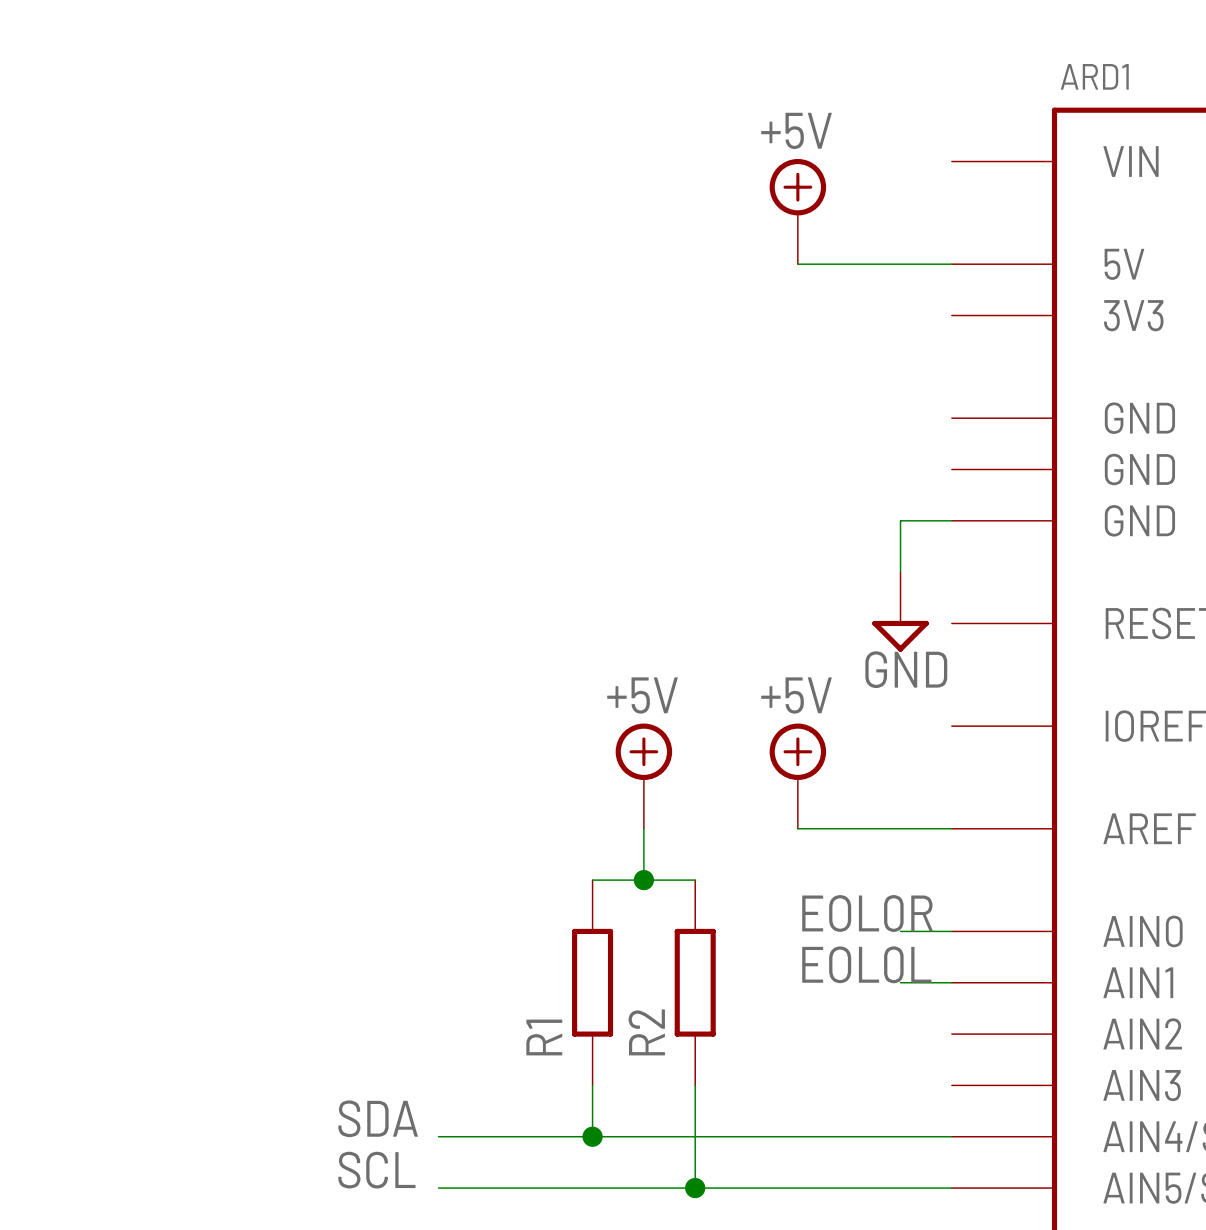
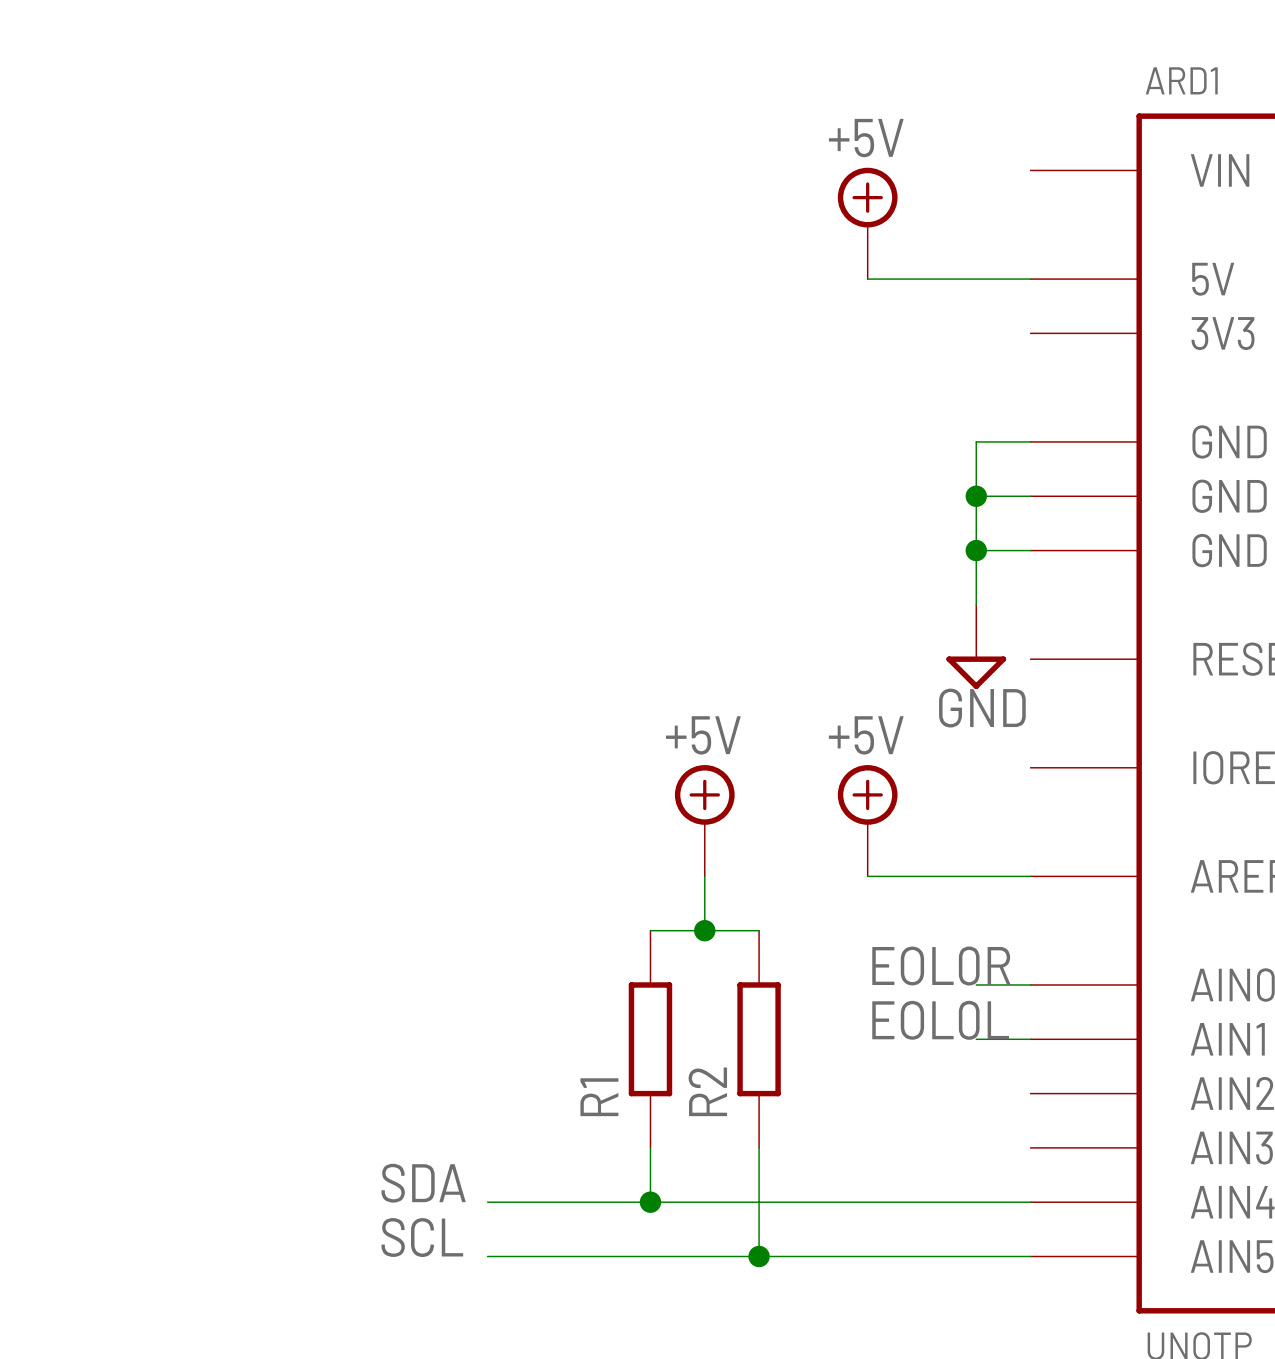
wire: none -> (1030, 441) (976, 441) (976, 550)
wire: none -> (976, 496) (1030, 496)
junction: none -> (976, 496)
junction: none -> (976, 550)

